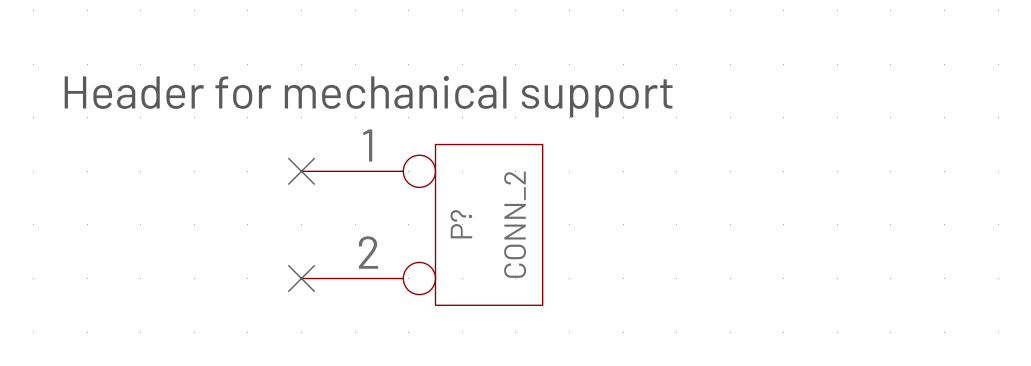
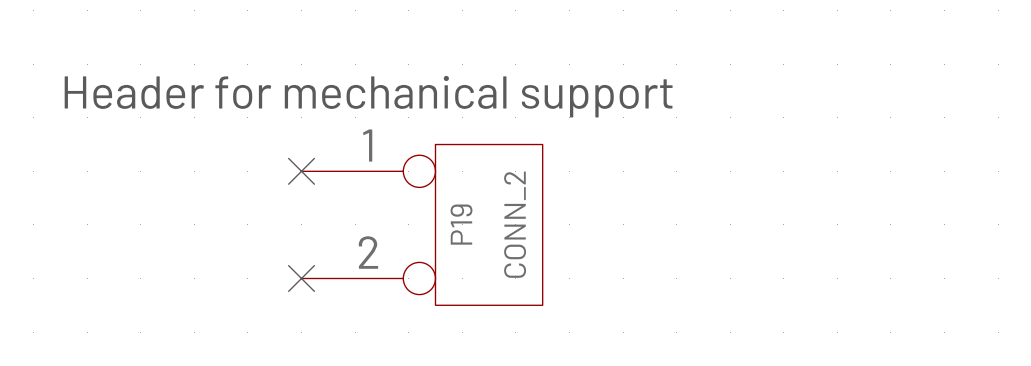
P? name: P? (461, 224) -> P19 (461, 224)

